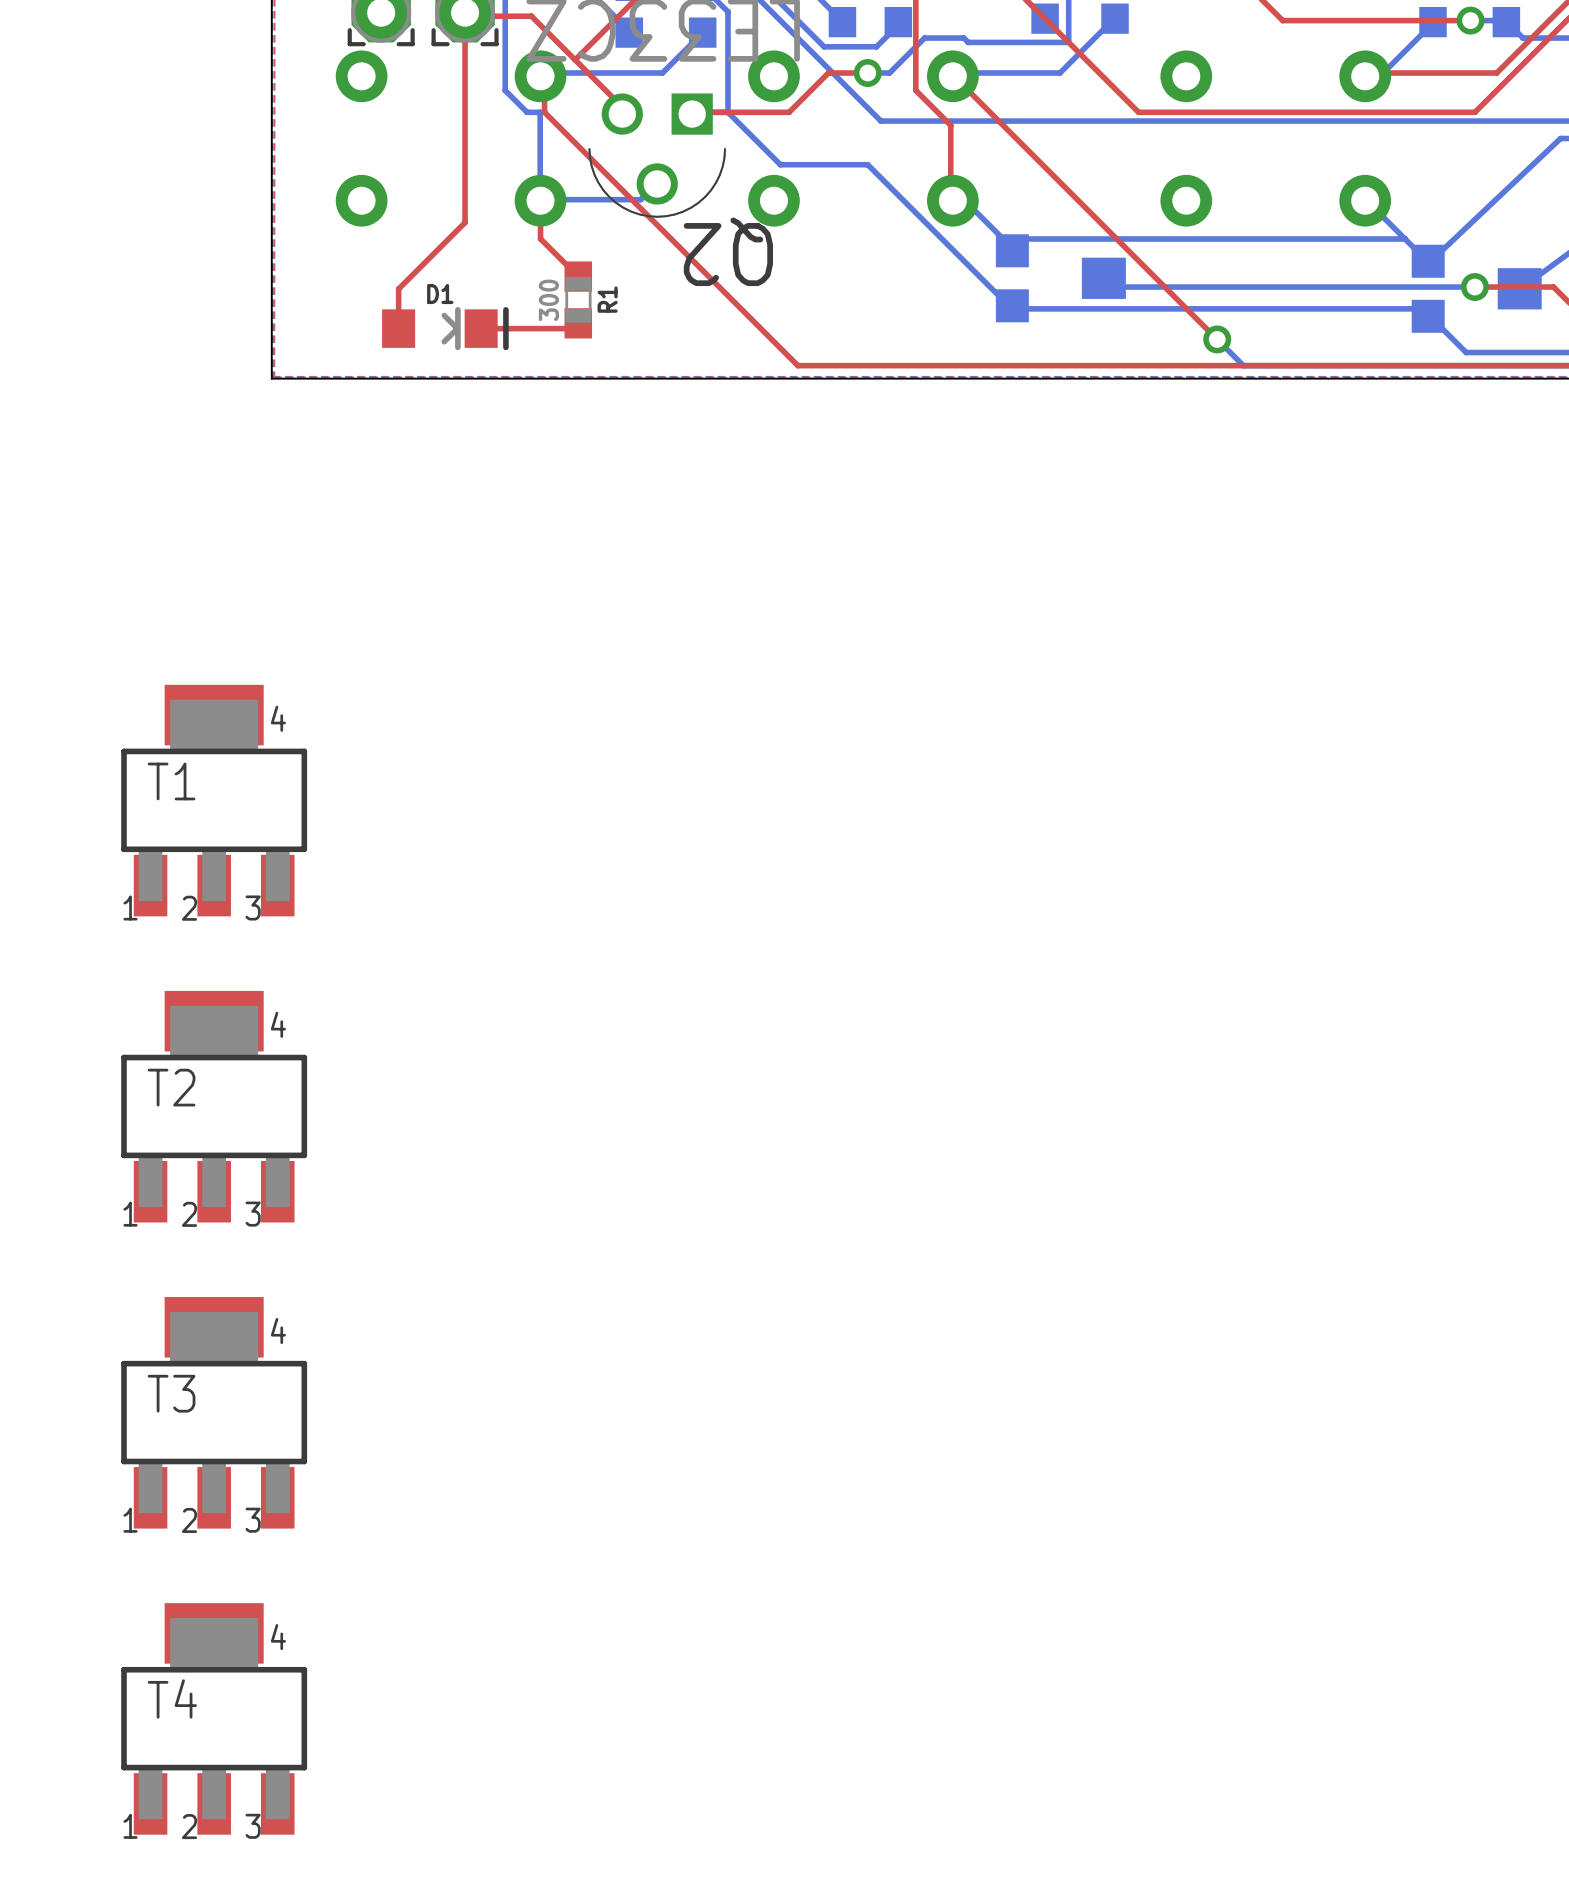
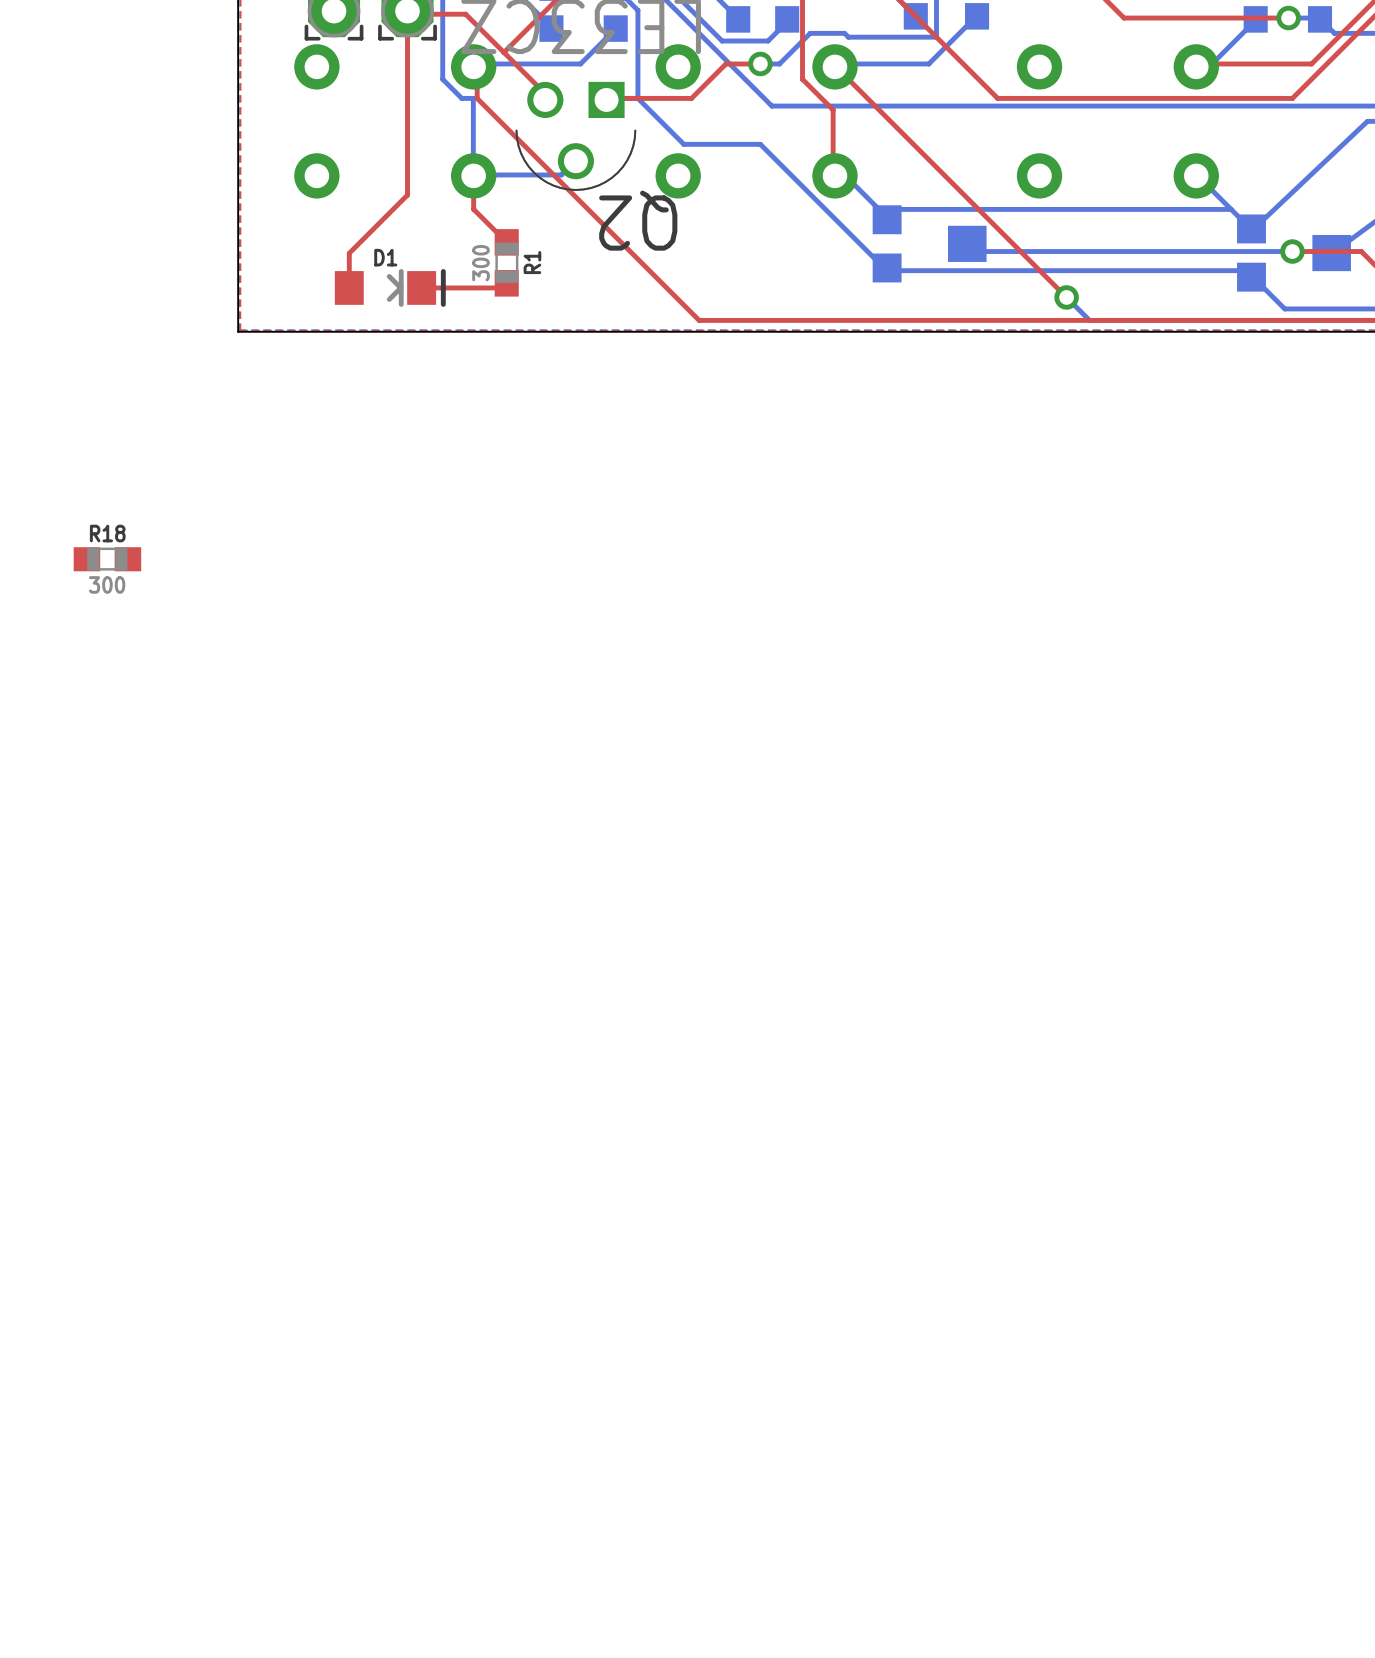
R18: none -> 300 (107, 559)
T1: (214, 800) -> none
T2: (214, 1106) -> none
T3: (214, 1412) -> none
T4: (214, 1718) -> none

